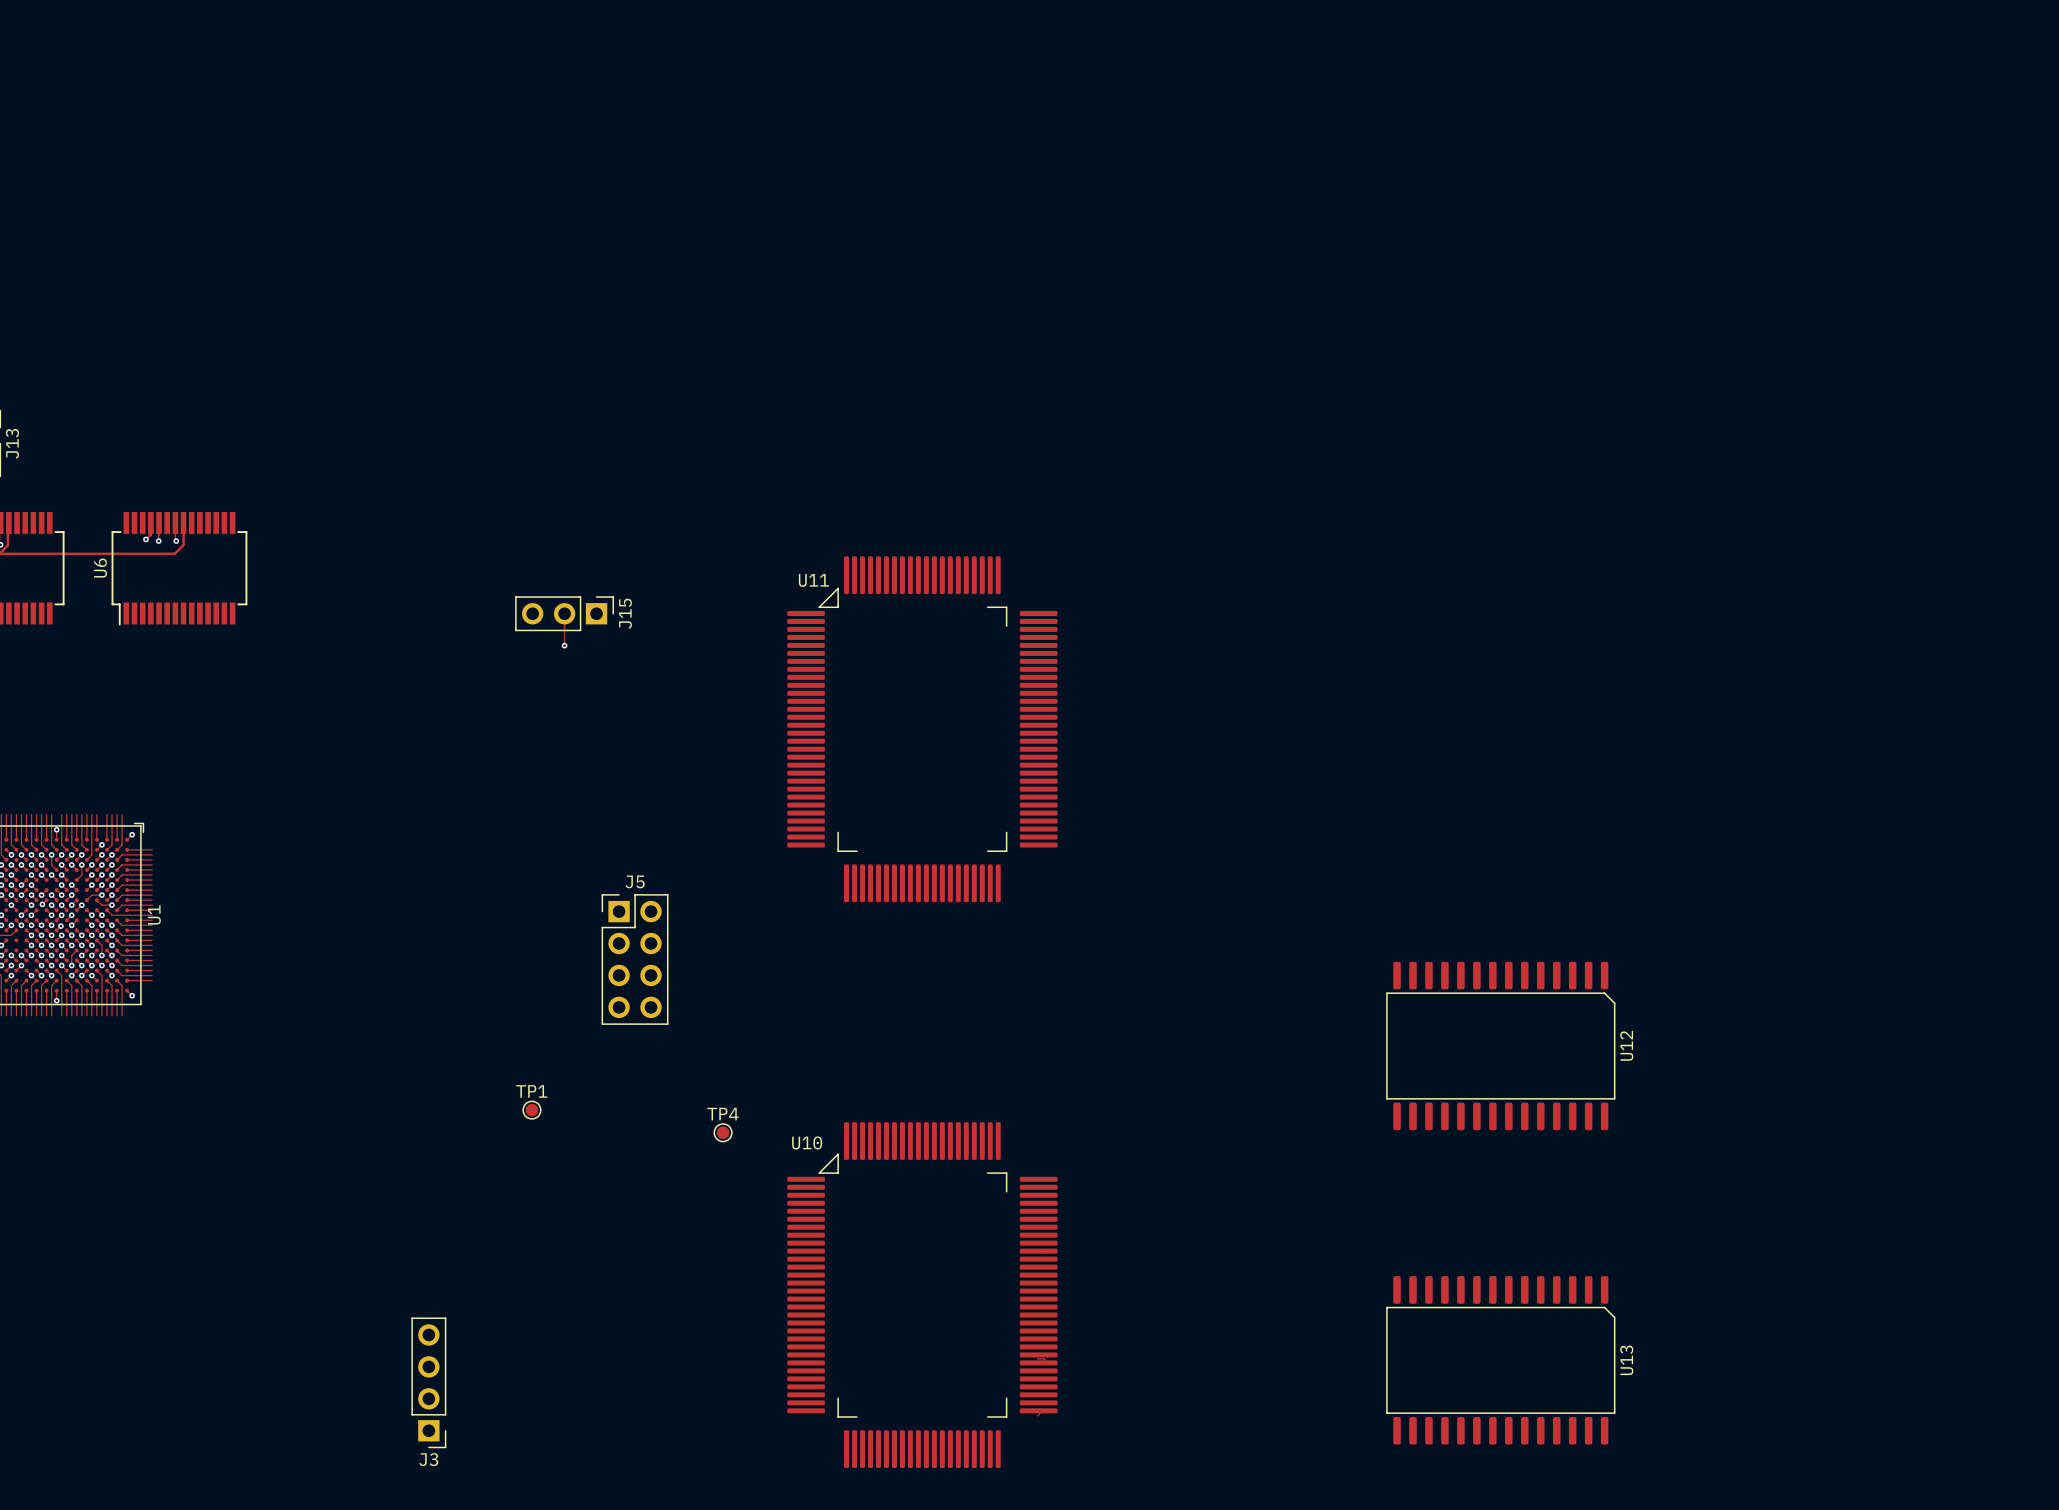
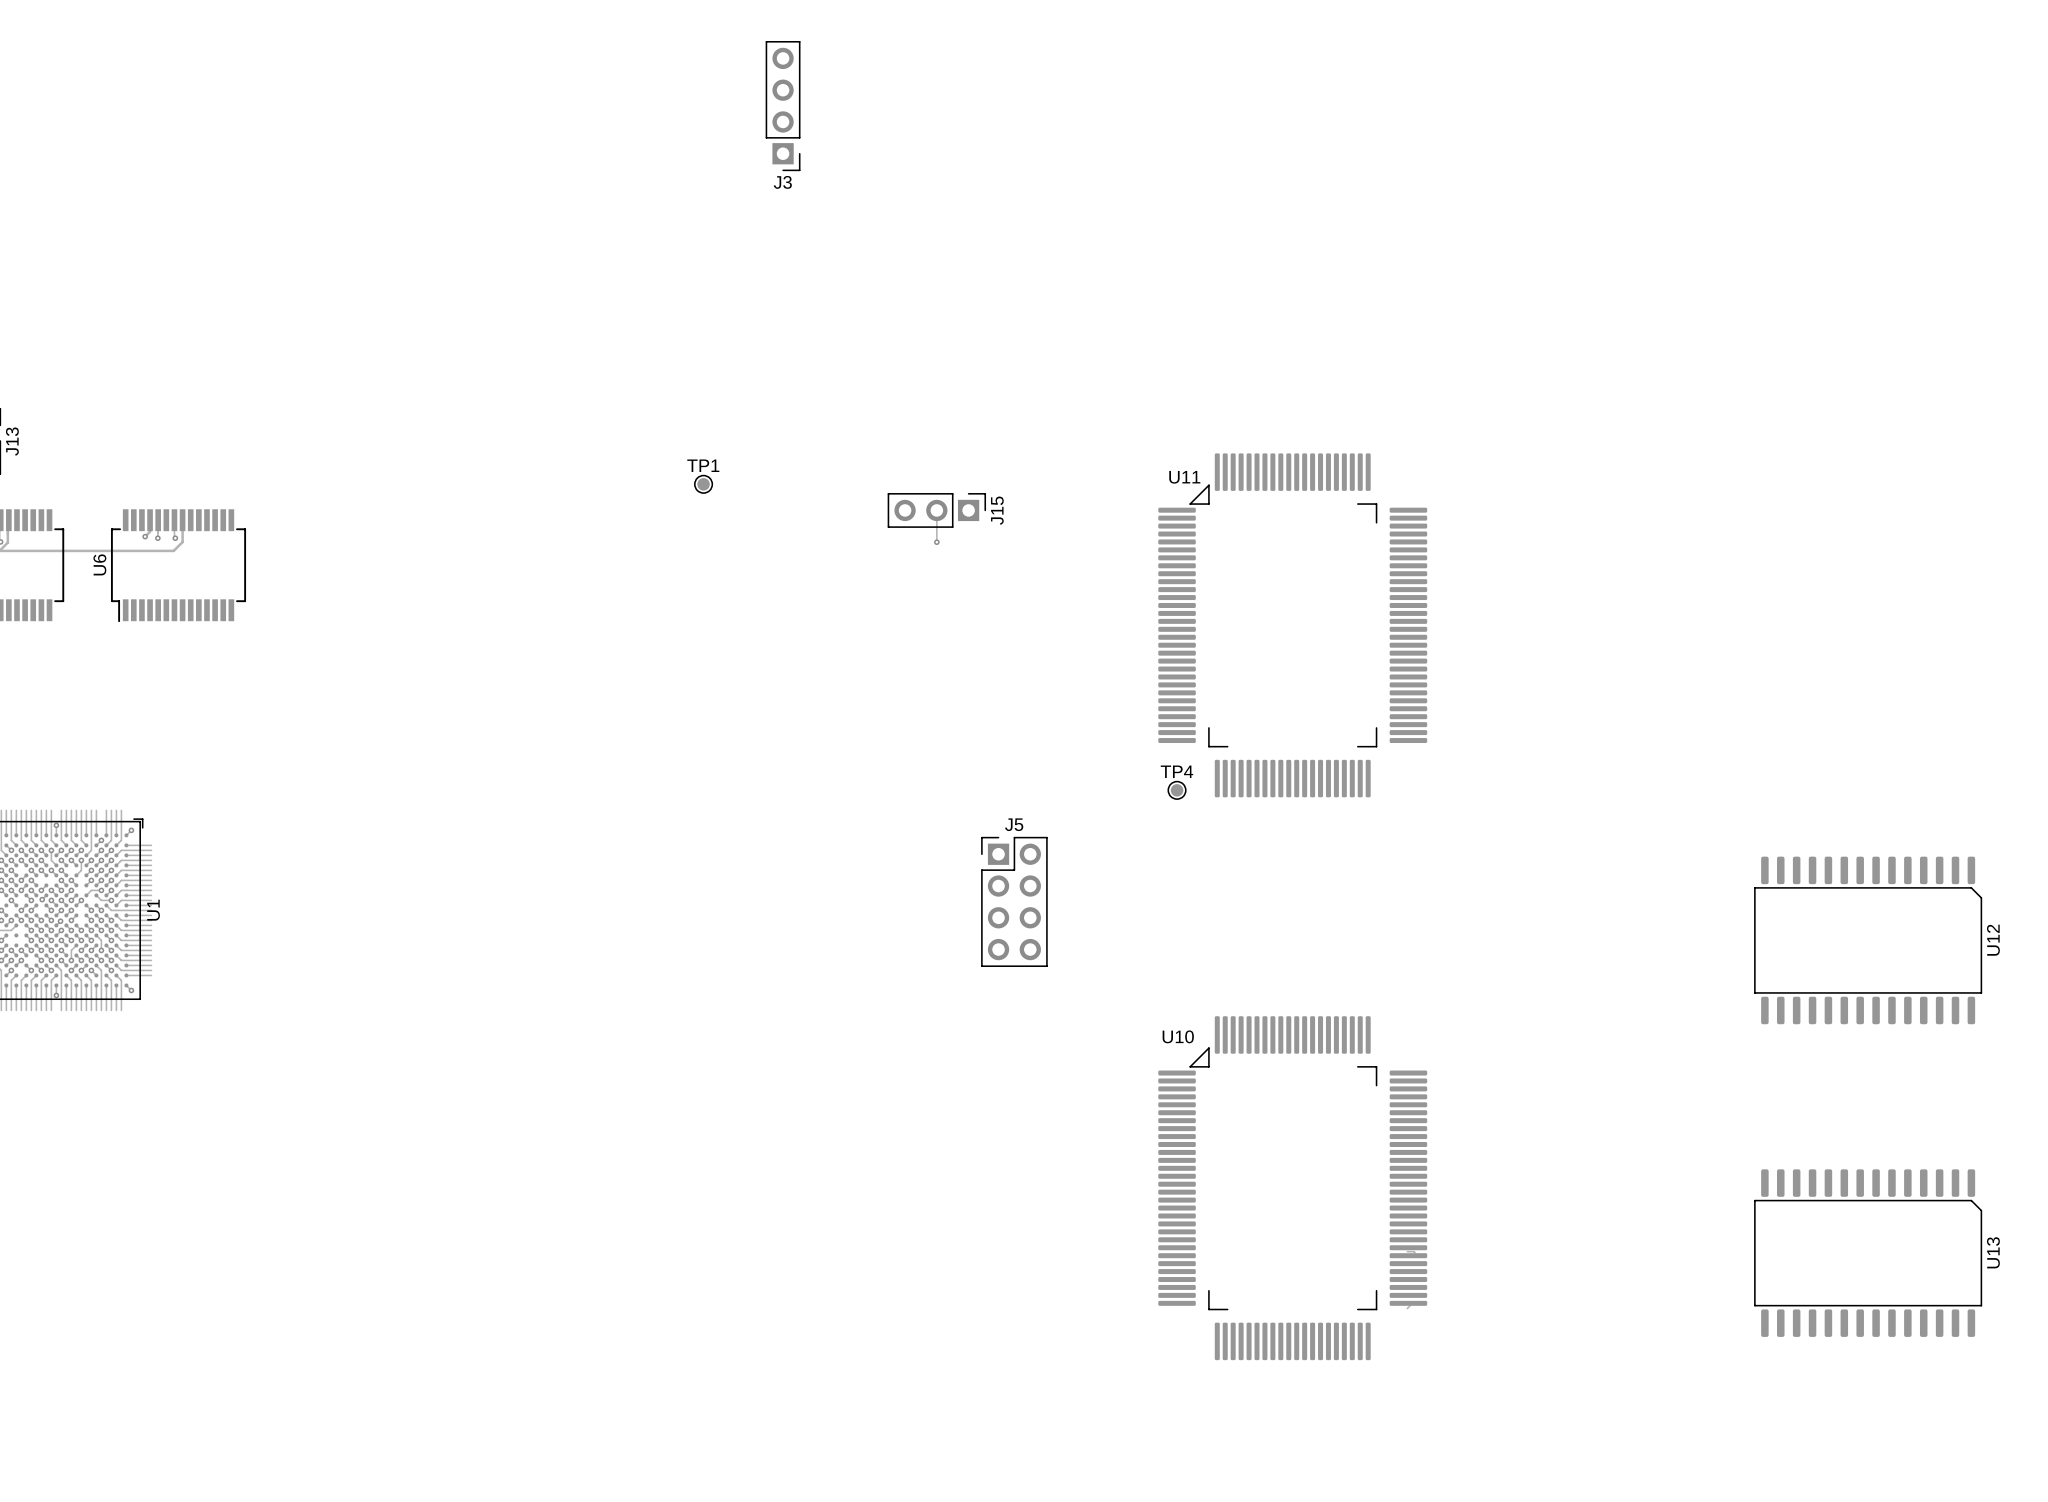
track: none -> (936, 510) (936, 542)
via: none -> (936, 542)
track: (564, 613) (564, 645) -> none
J15 position: (564, 613) -> (936, 510)
via: (564, 645) -> none
U11 position: (922, 729) -> (1292, 625)
J5 position: (635, 959) -> (1014, 901)
U12 position: (1500, 1046) -> (1868, 940)
TP1 position: (531, 1110) -> (703, 484)
TP4 position: (723, 1132) -> (1177, 790)
track: none -> (1407, 1251) (1415, 1252)
U10 position: (922, 1295) -> (1292, 1188)
track: none -> (1410, 1305) (1407, 1308)
track: (1037, 1358) (1045, 1360) -> none
U13 position: (1500, 1360) -> (1868, 1253)
J3 position: (428, 1382) -> (783, 106)
track: (1040, 1412) (1037, 1416) -> none

